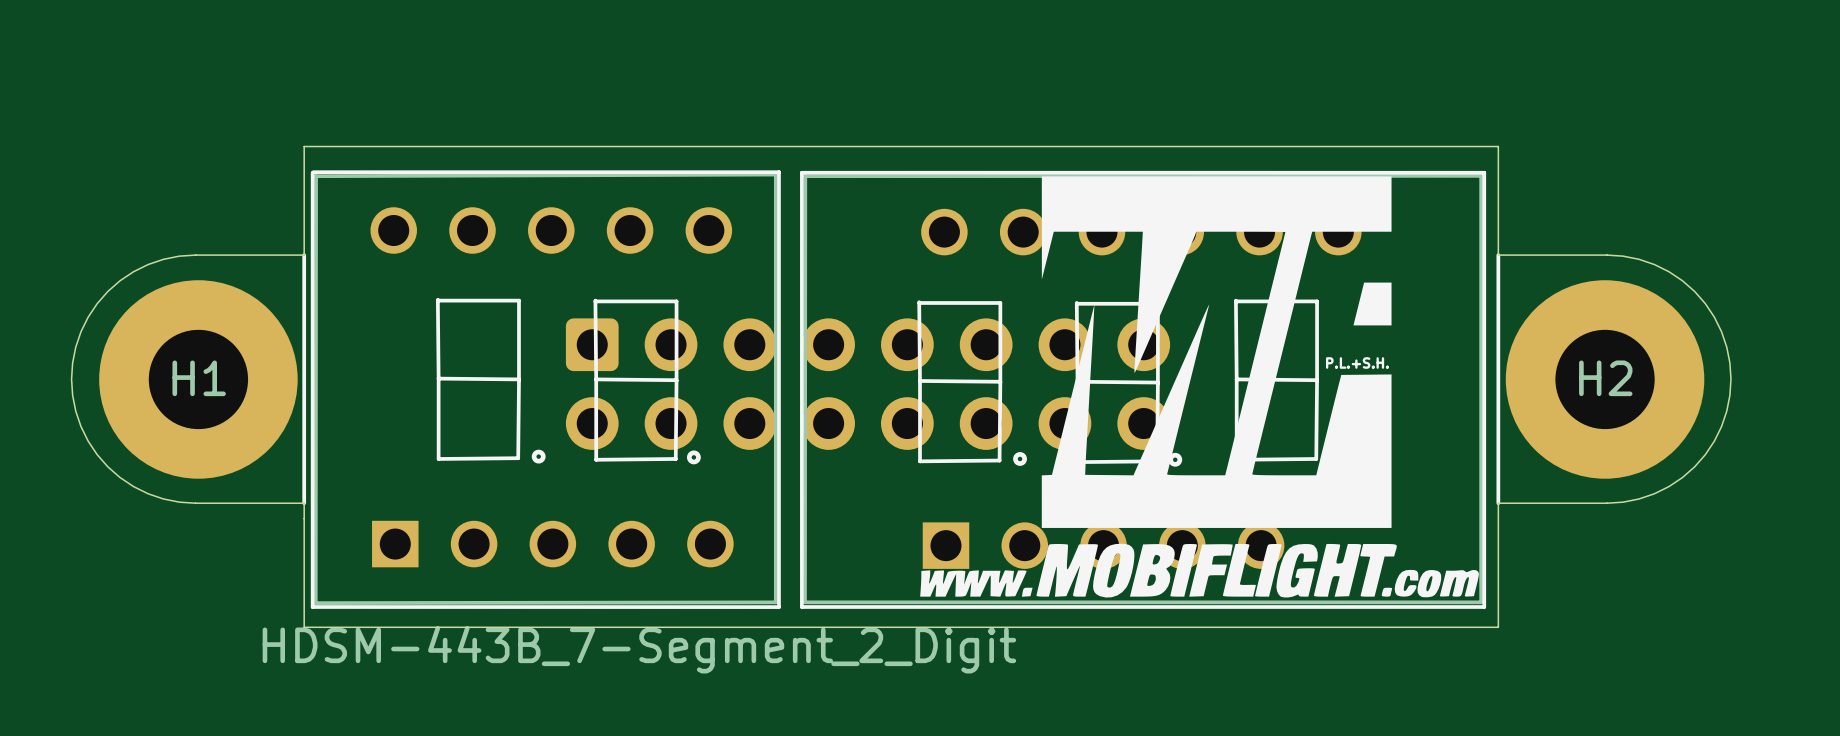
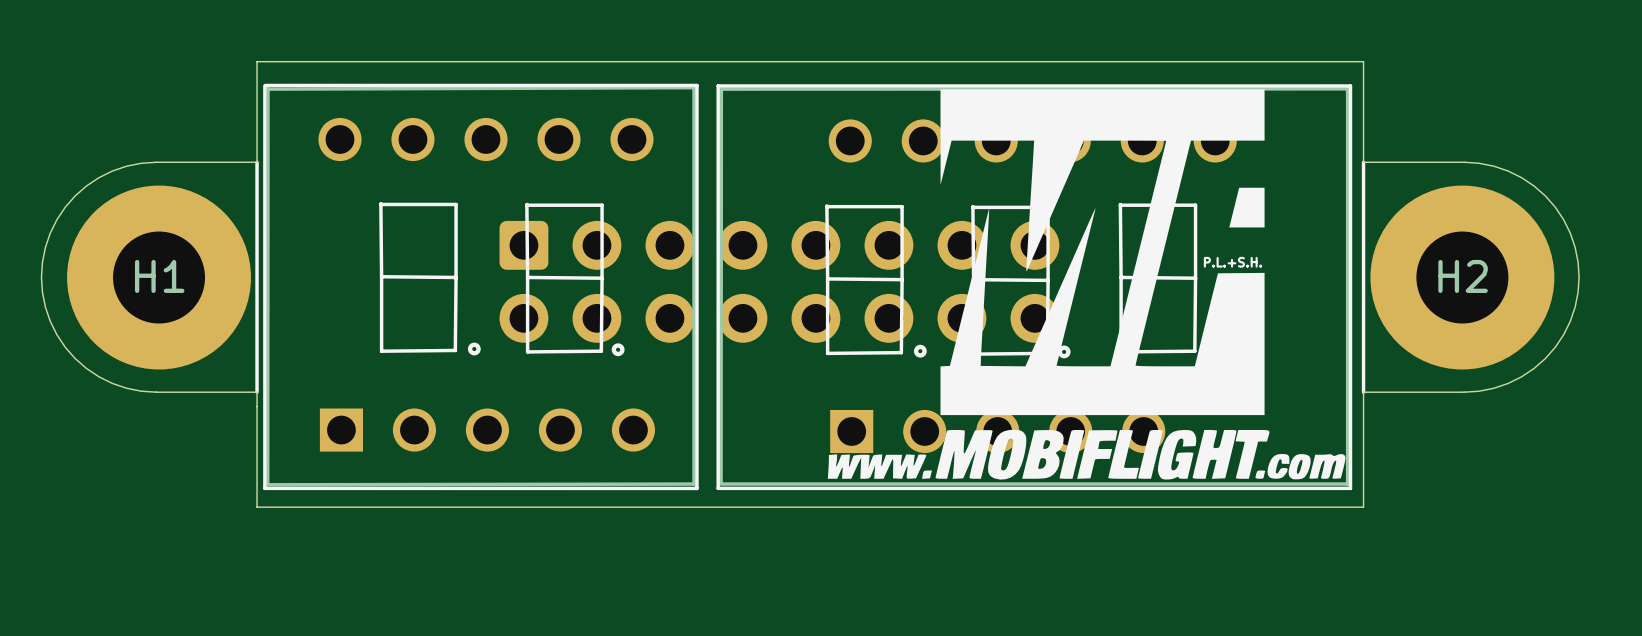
part value: HDSM-443B_7-Segment_2_Digit (639, 649) -> none

